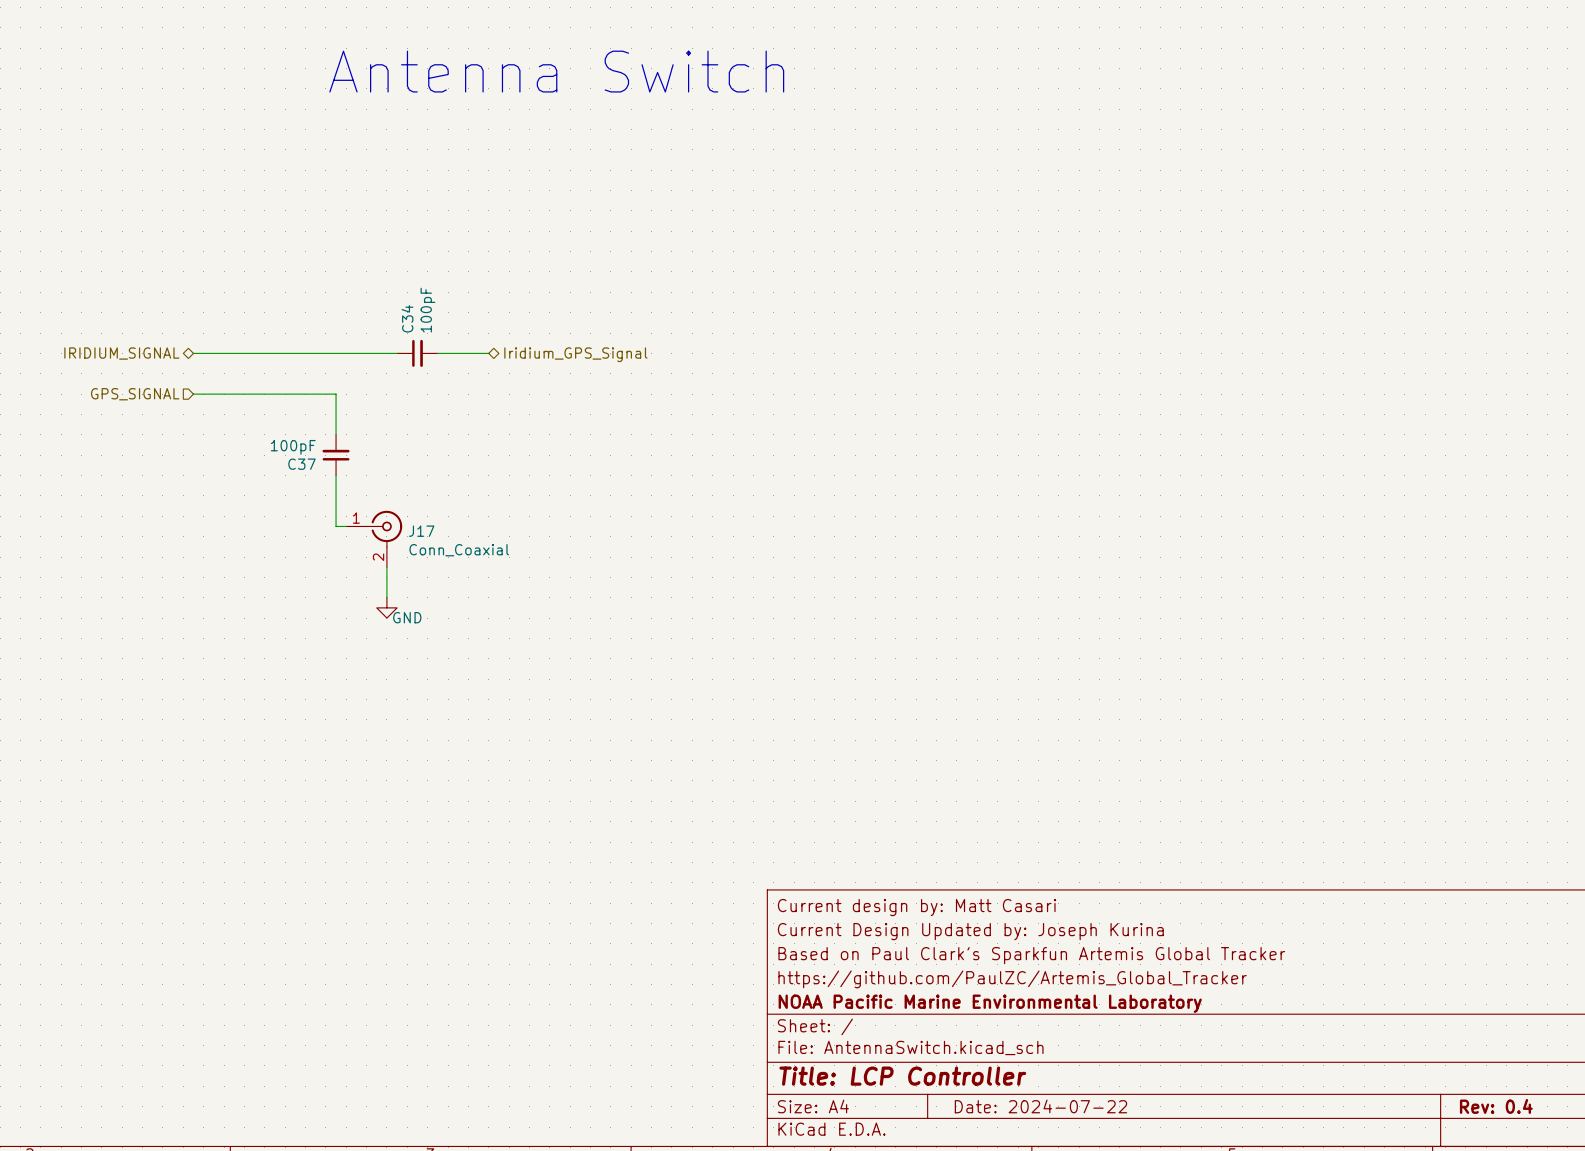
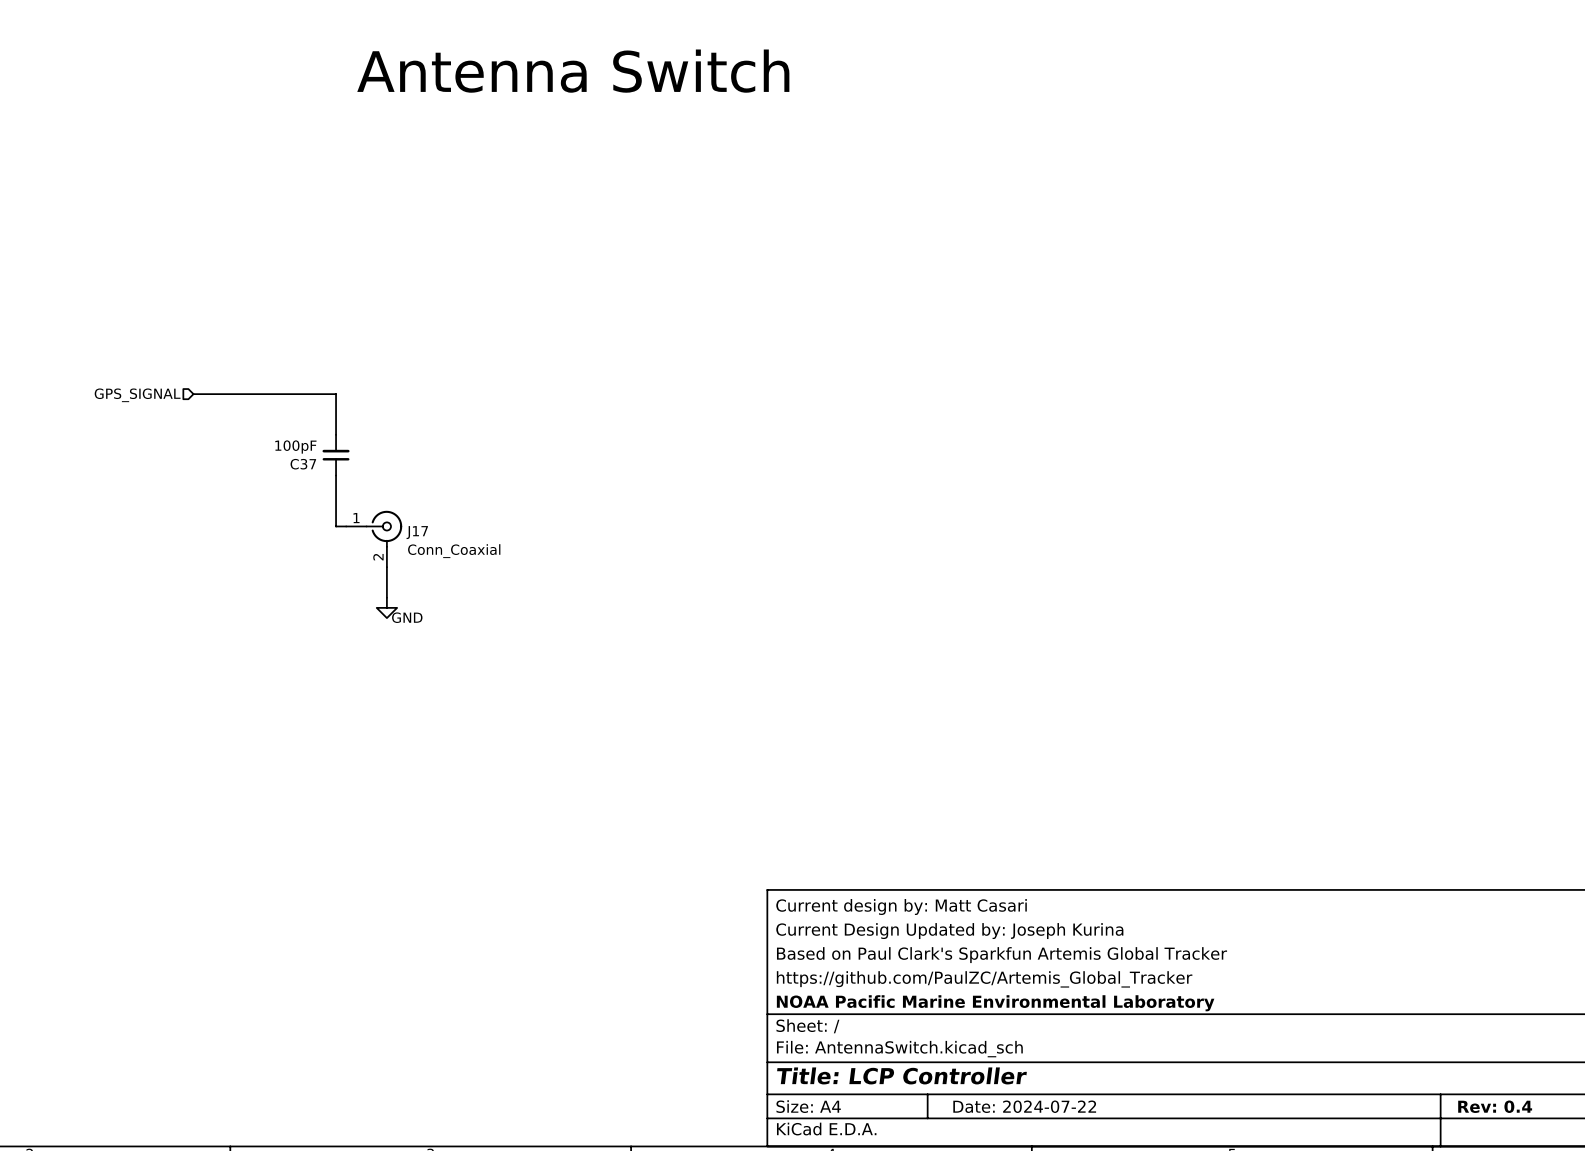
hierarchical label: IRIDIUM_SIGNAL (121, 353) -> none
wire: (193, 353) (397, 353) -> none
C34: 100pF (417, 353) -> none
wire: (437, 353) (488, 353) -> none
hierarchical label: Iridium_GPS_Signal (575, 354) -> none

